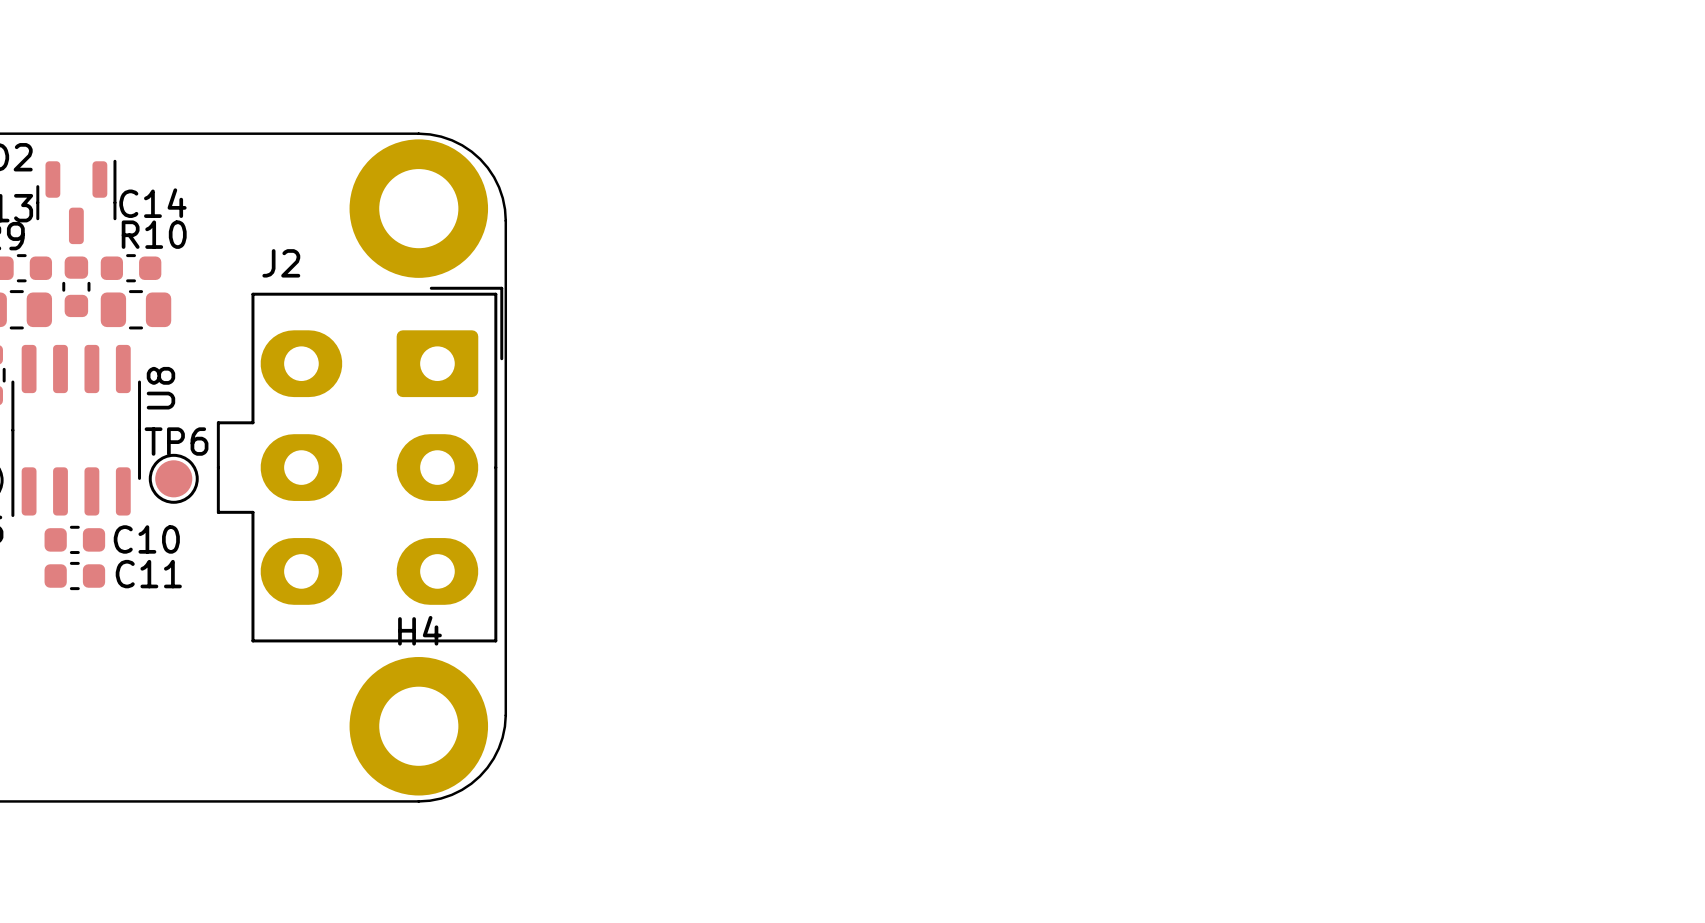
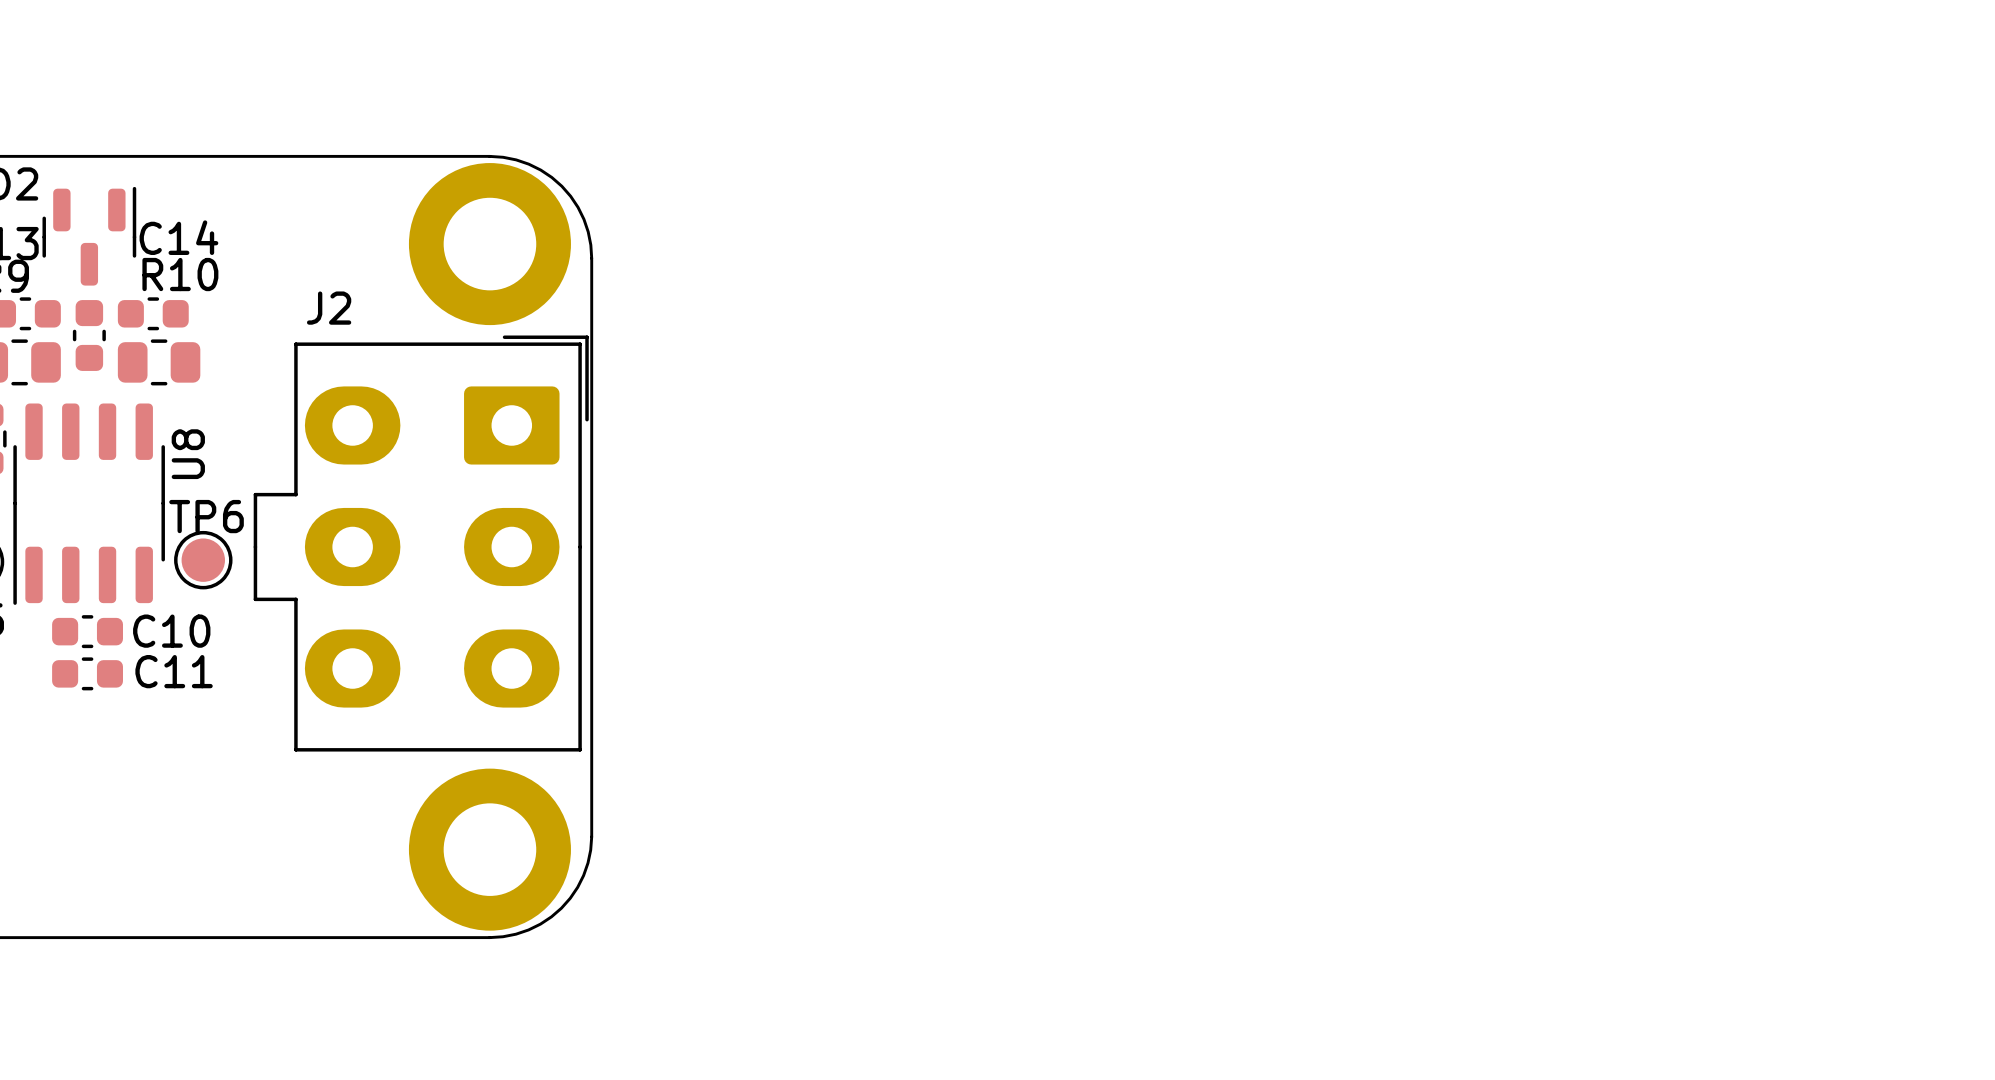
H4 name: H4 (419, 630) -> none

